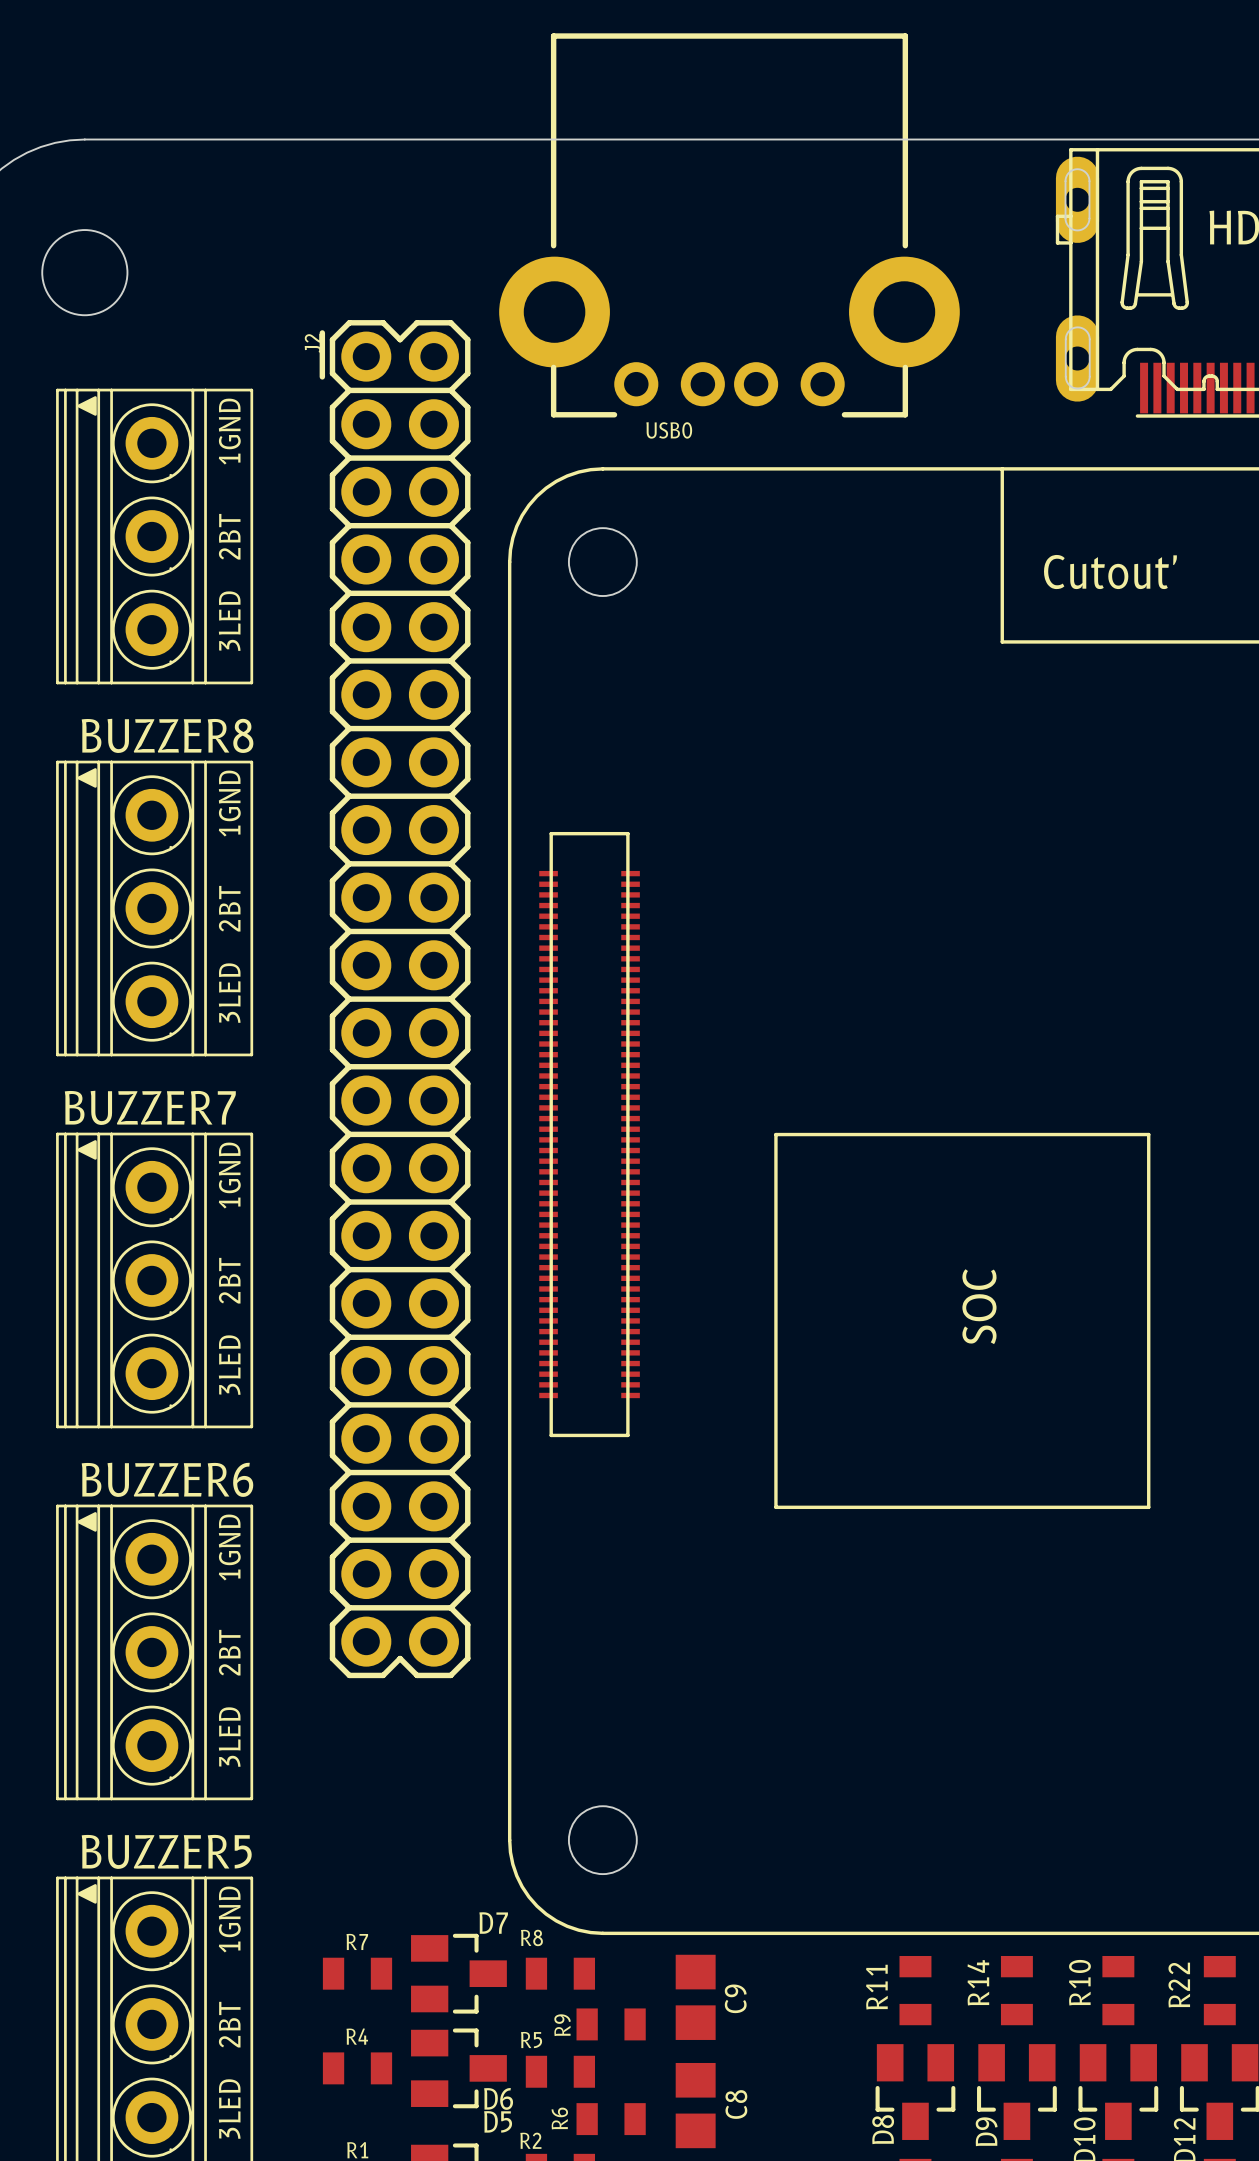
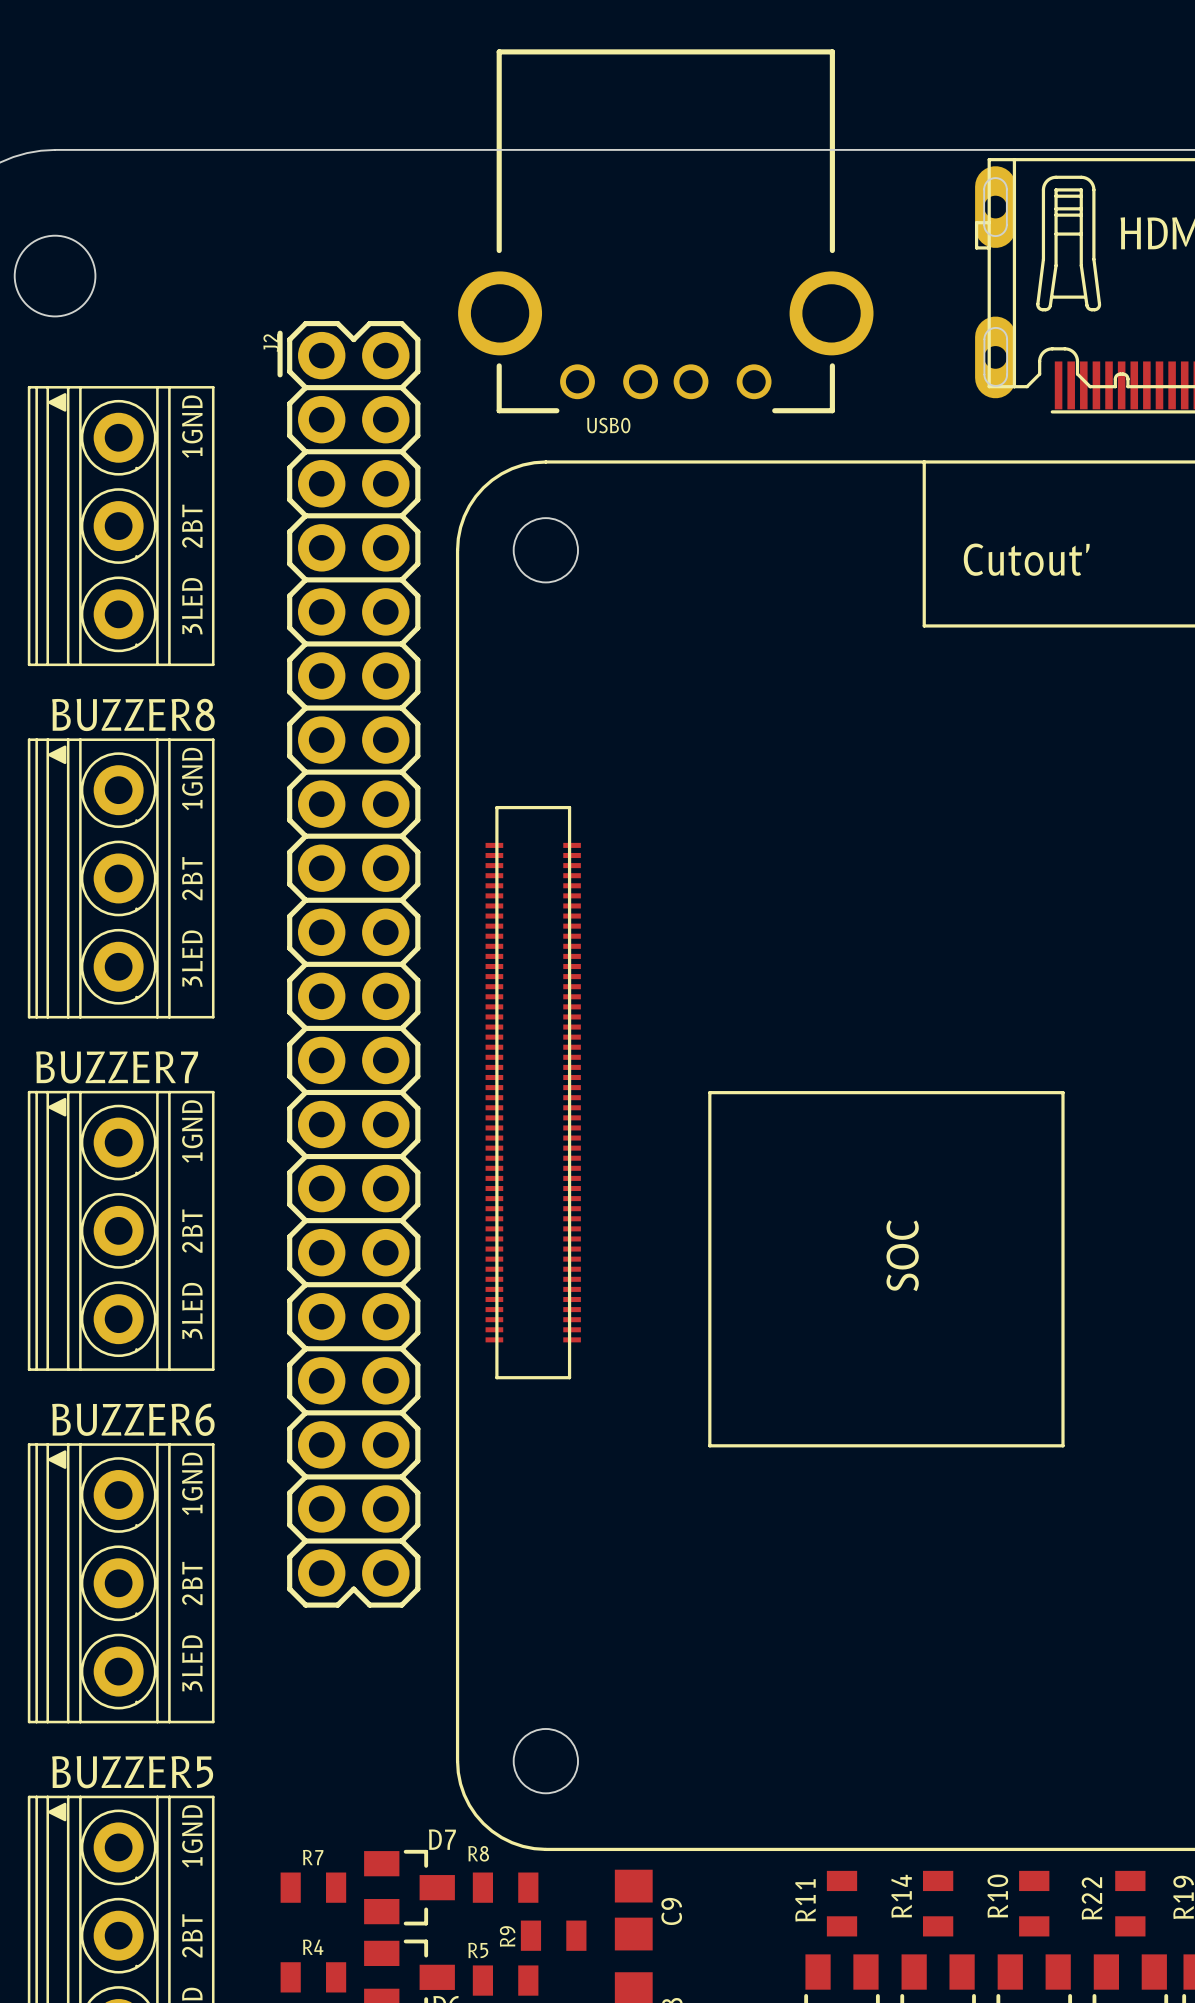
USB0 footprint: [499, 33, 960, 418] -> [458, 49, 874, 414]

